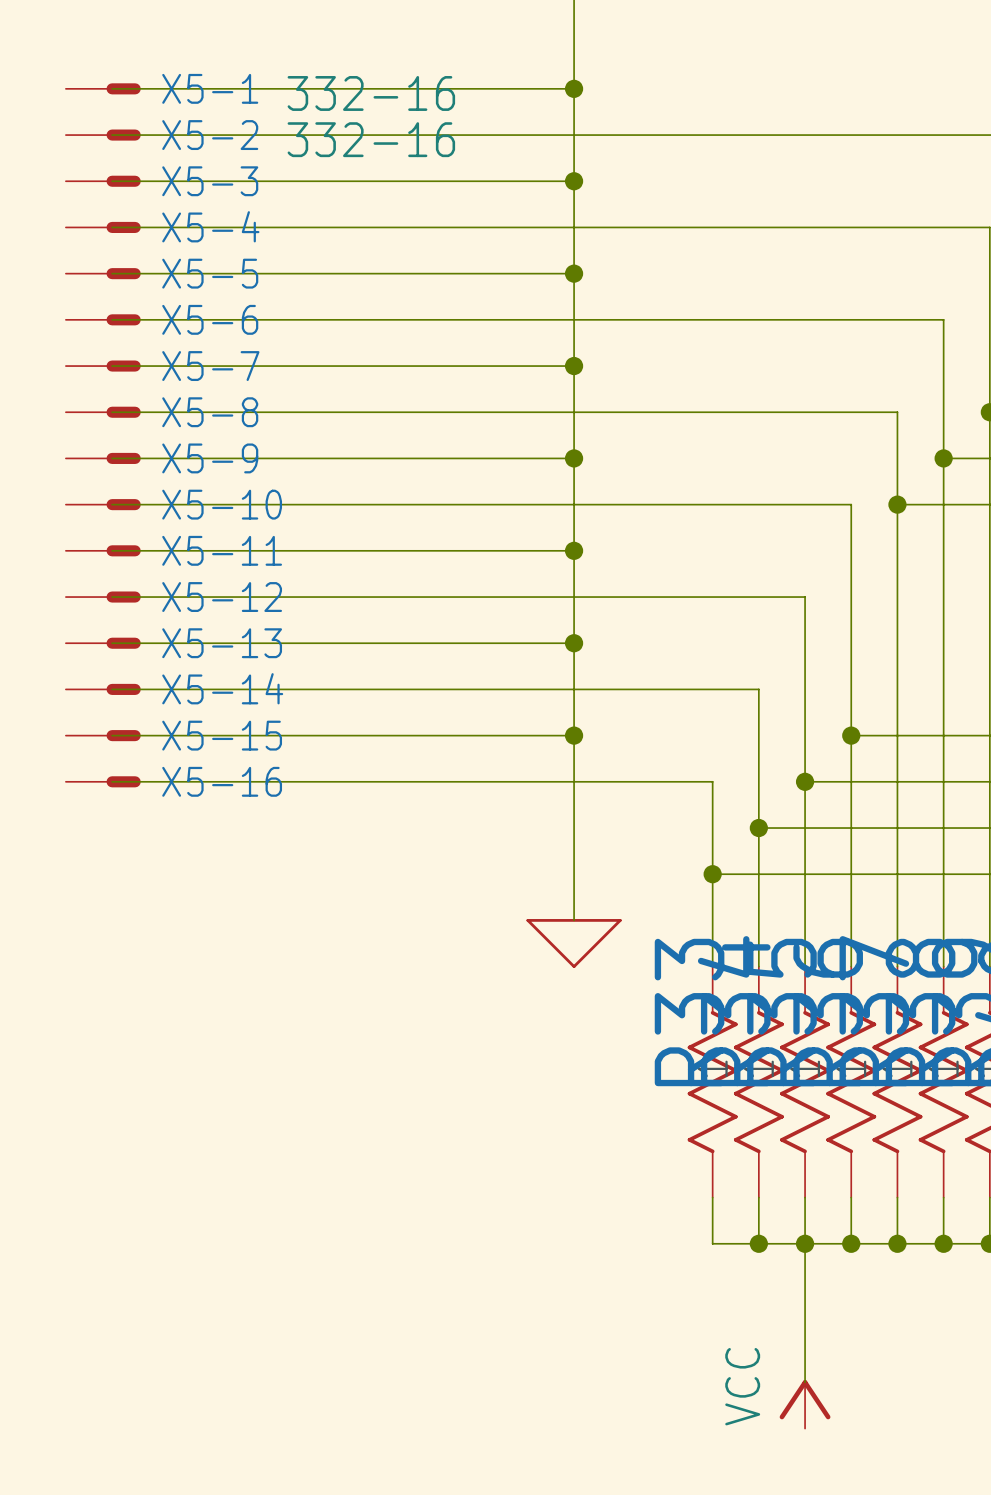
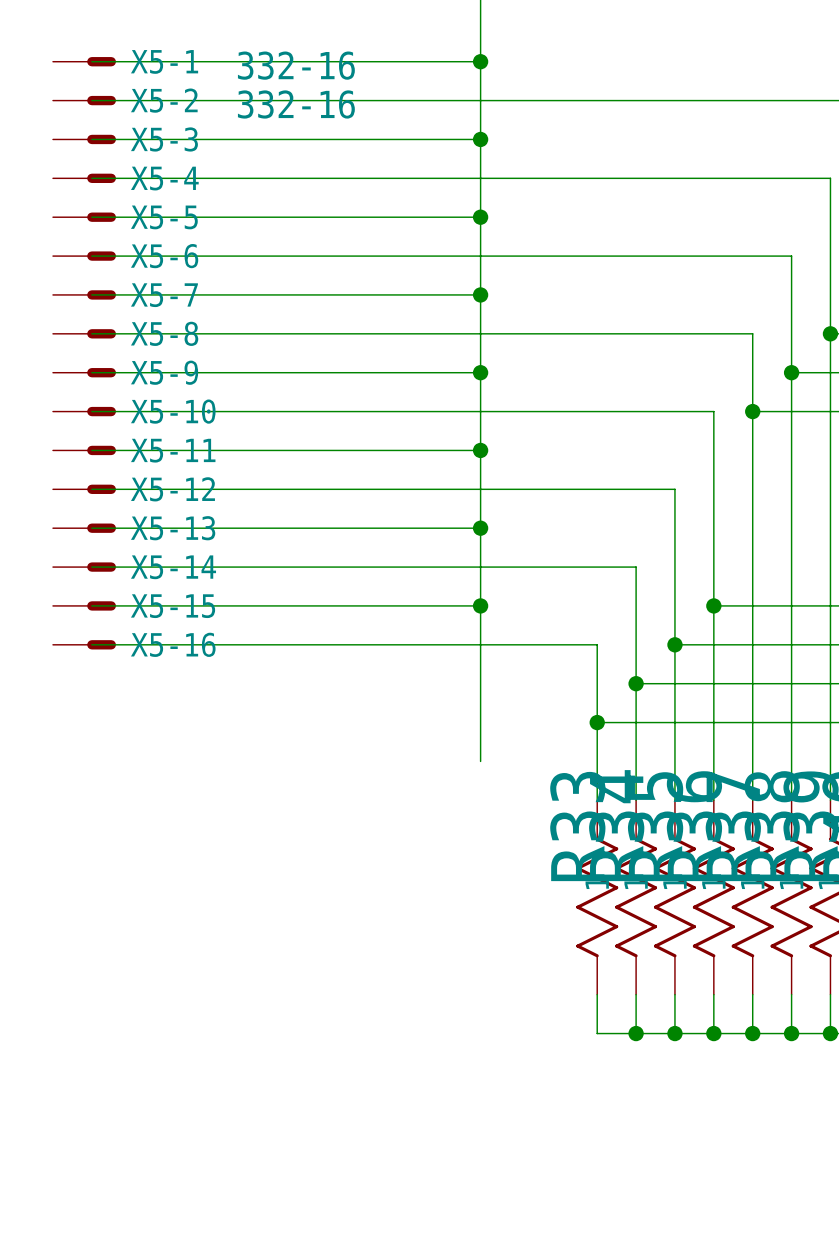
power symbol: (574, 943) -> none
wire: (805, 1243) (805, 1382) -> none
power symbol: VCC (805, 1404) -> none

